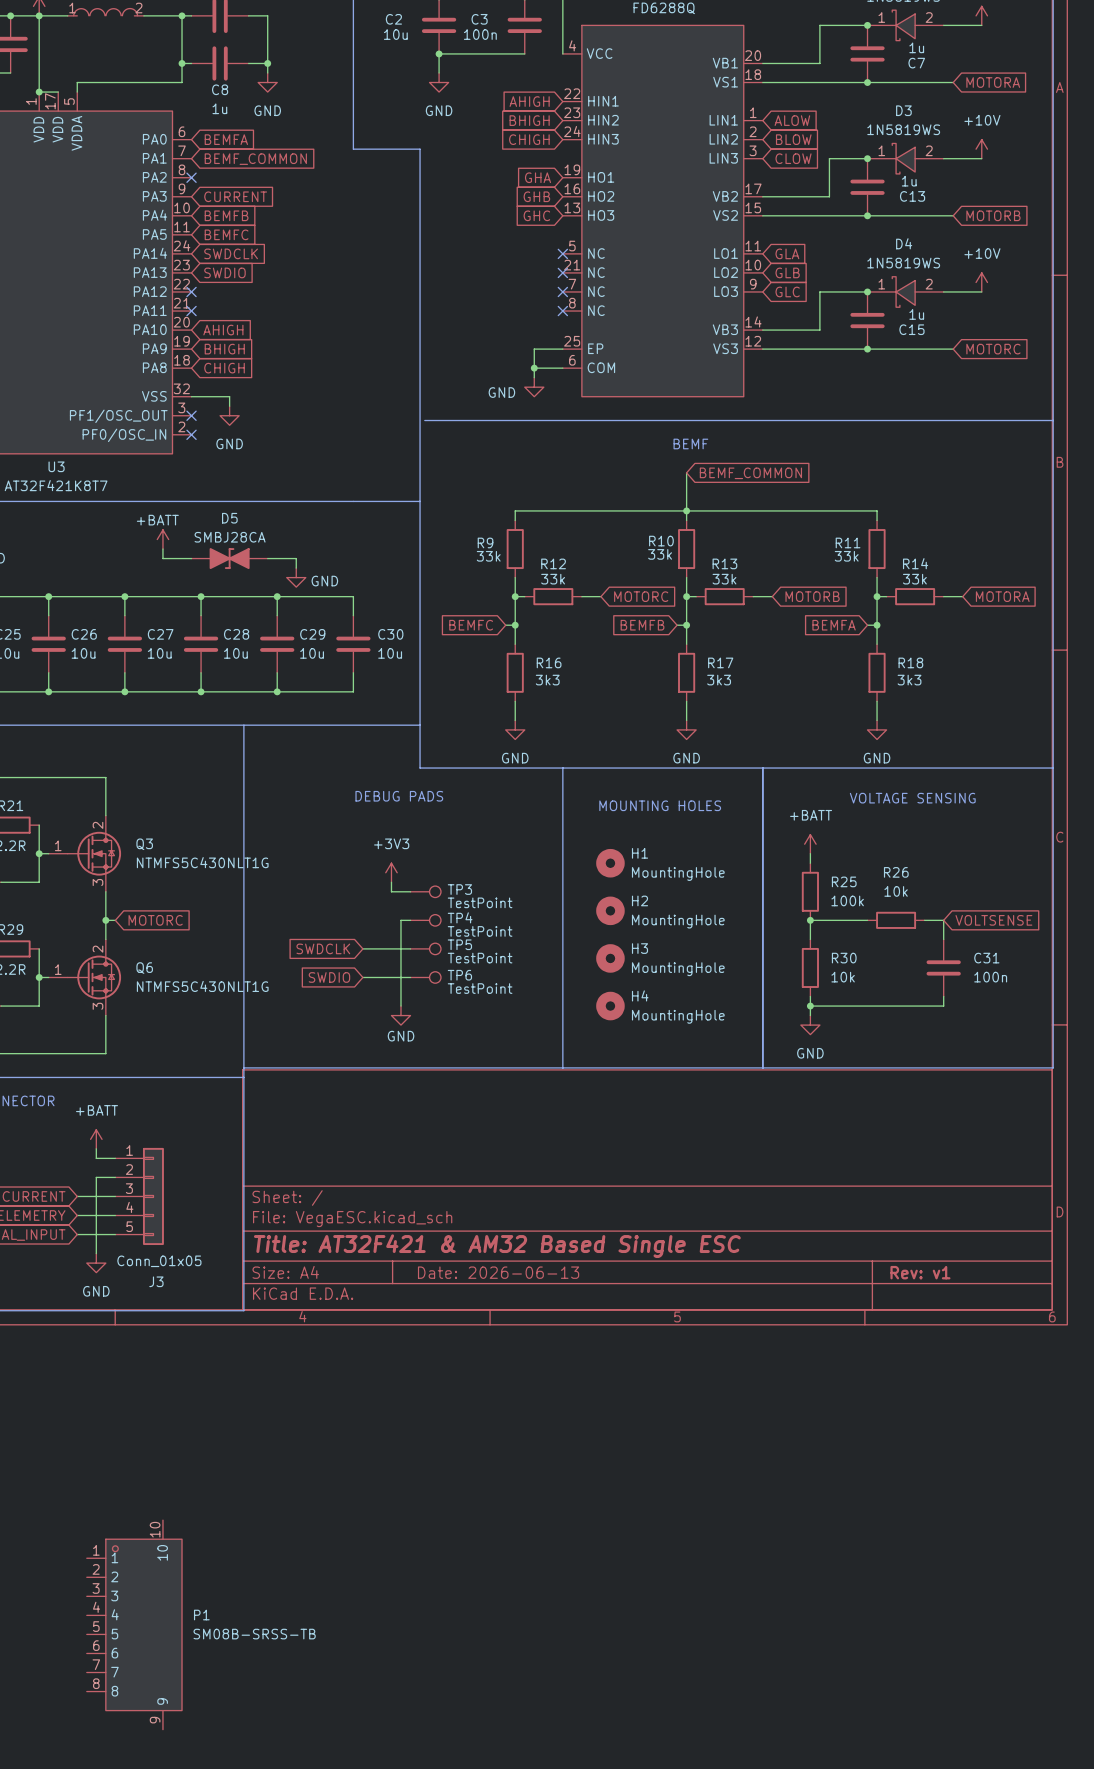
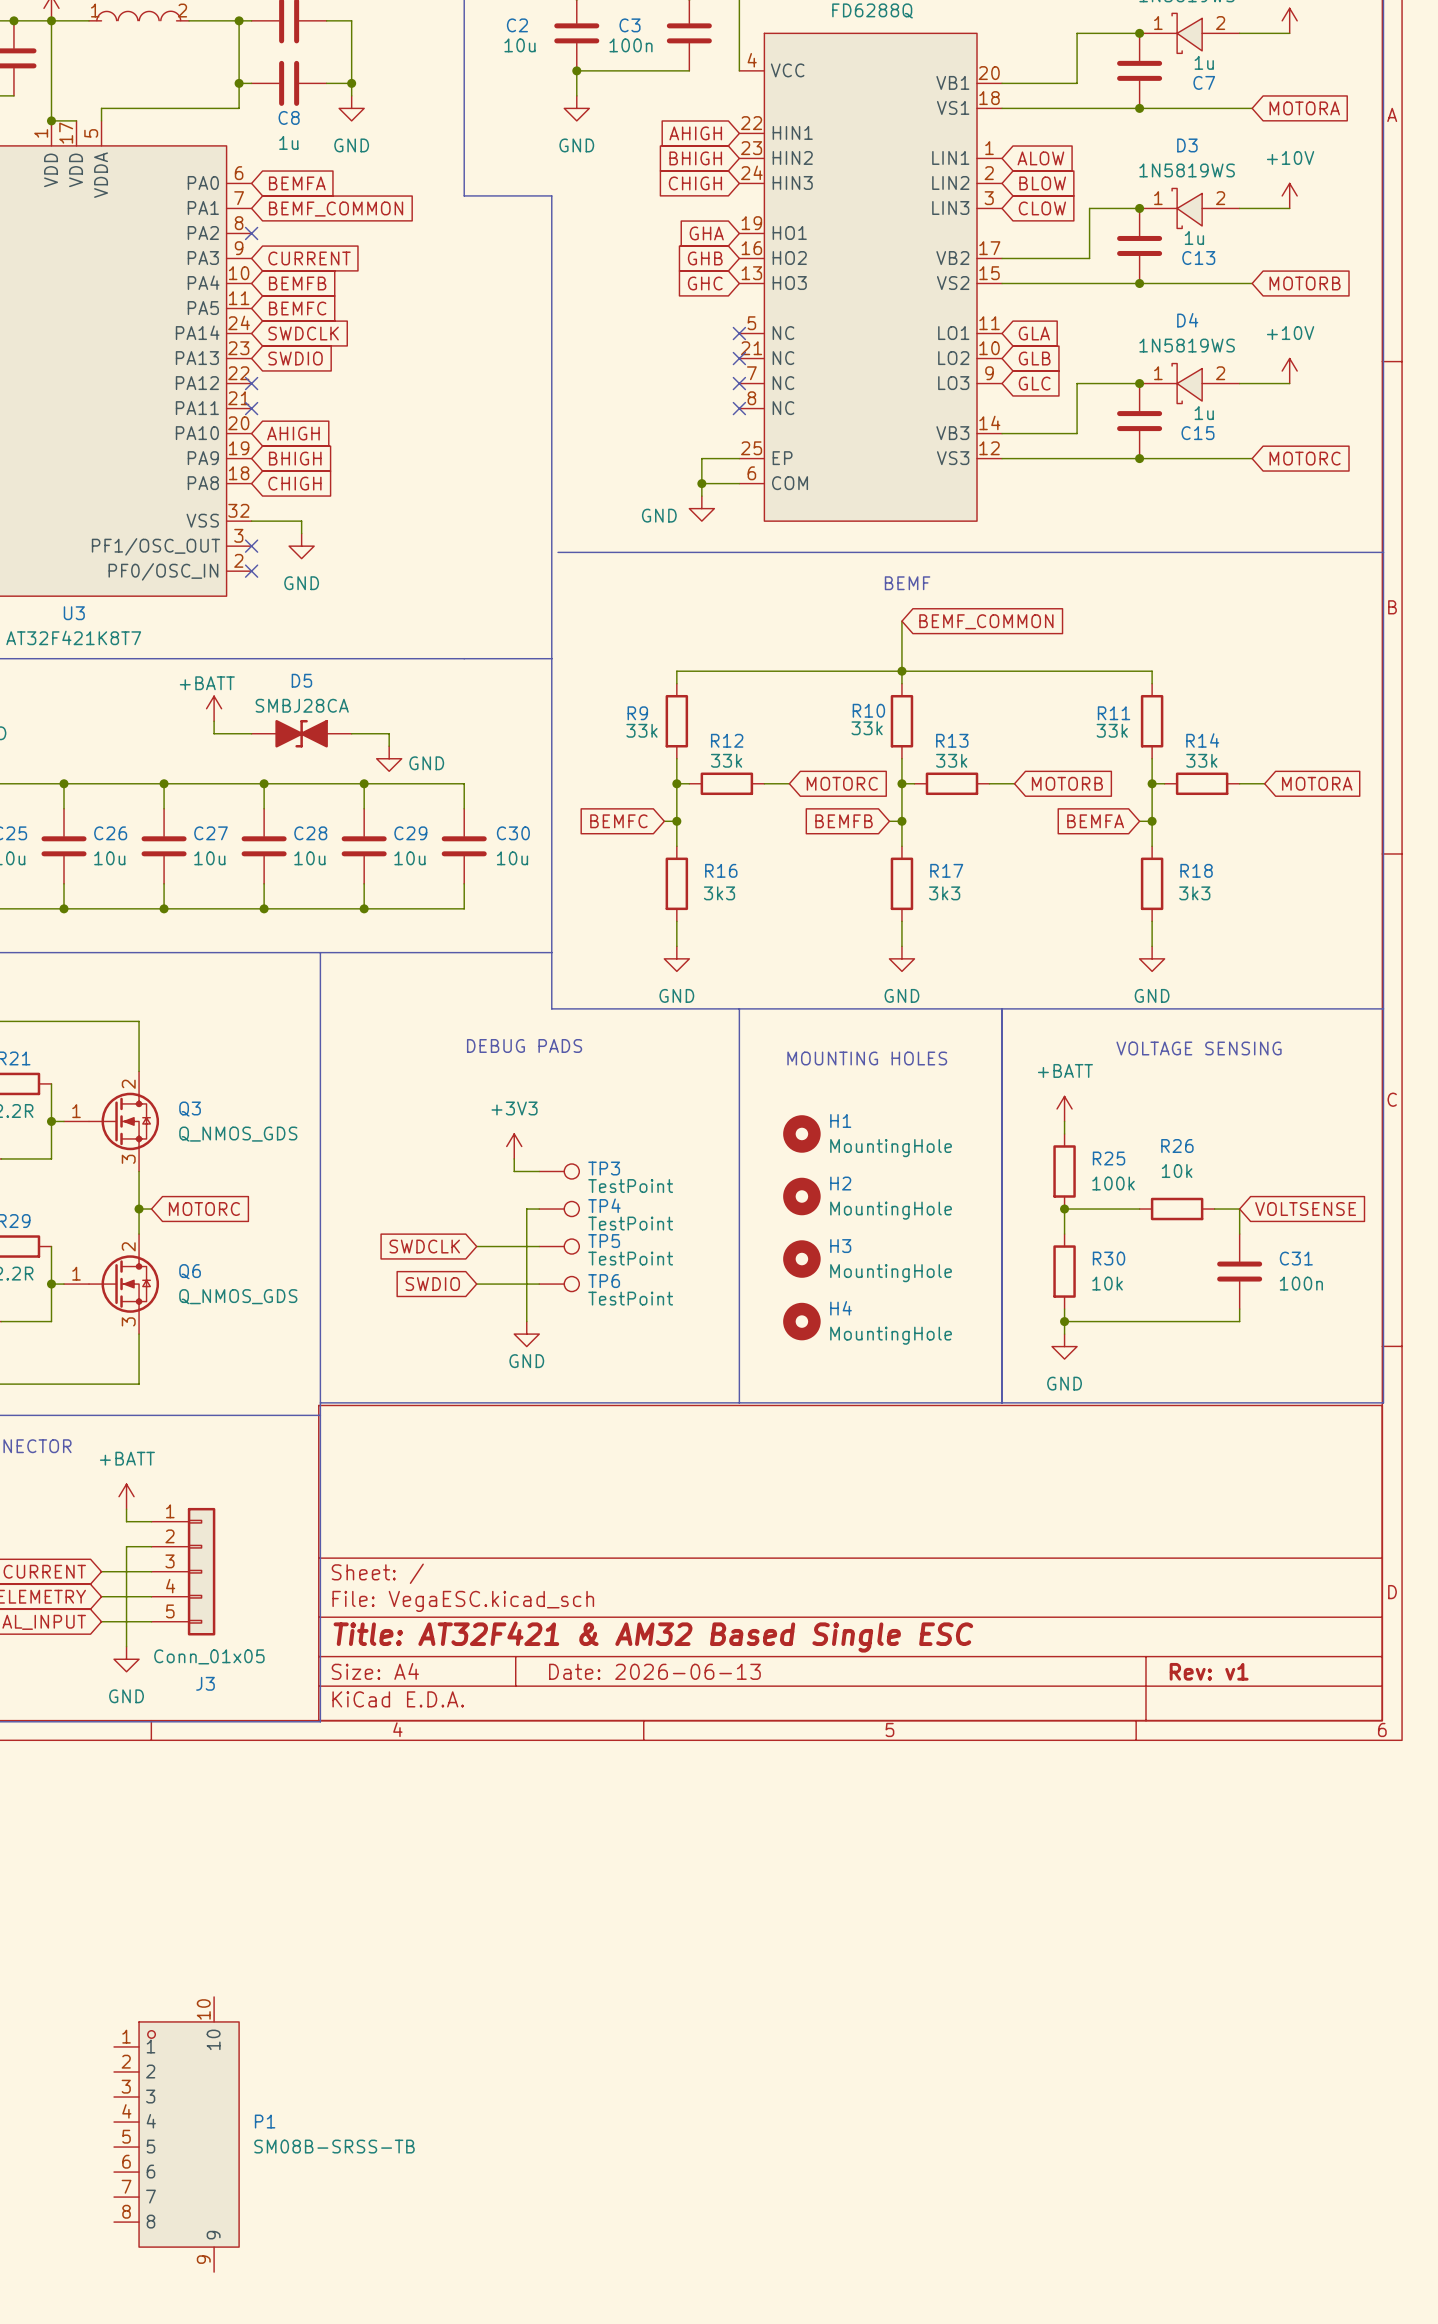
Q3 value: NTMFS5C430NLT1G (202, 862) -> Q_NMOS_GDS (238, 1134)
Q6 value: NTMFS5C430NLT1G (202, 986) -> Q_NMOS_GDS (238, 1296)

